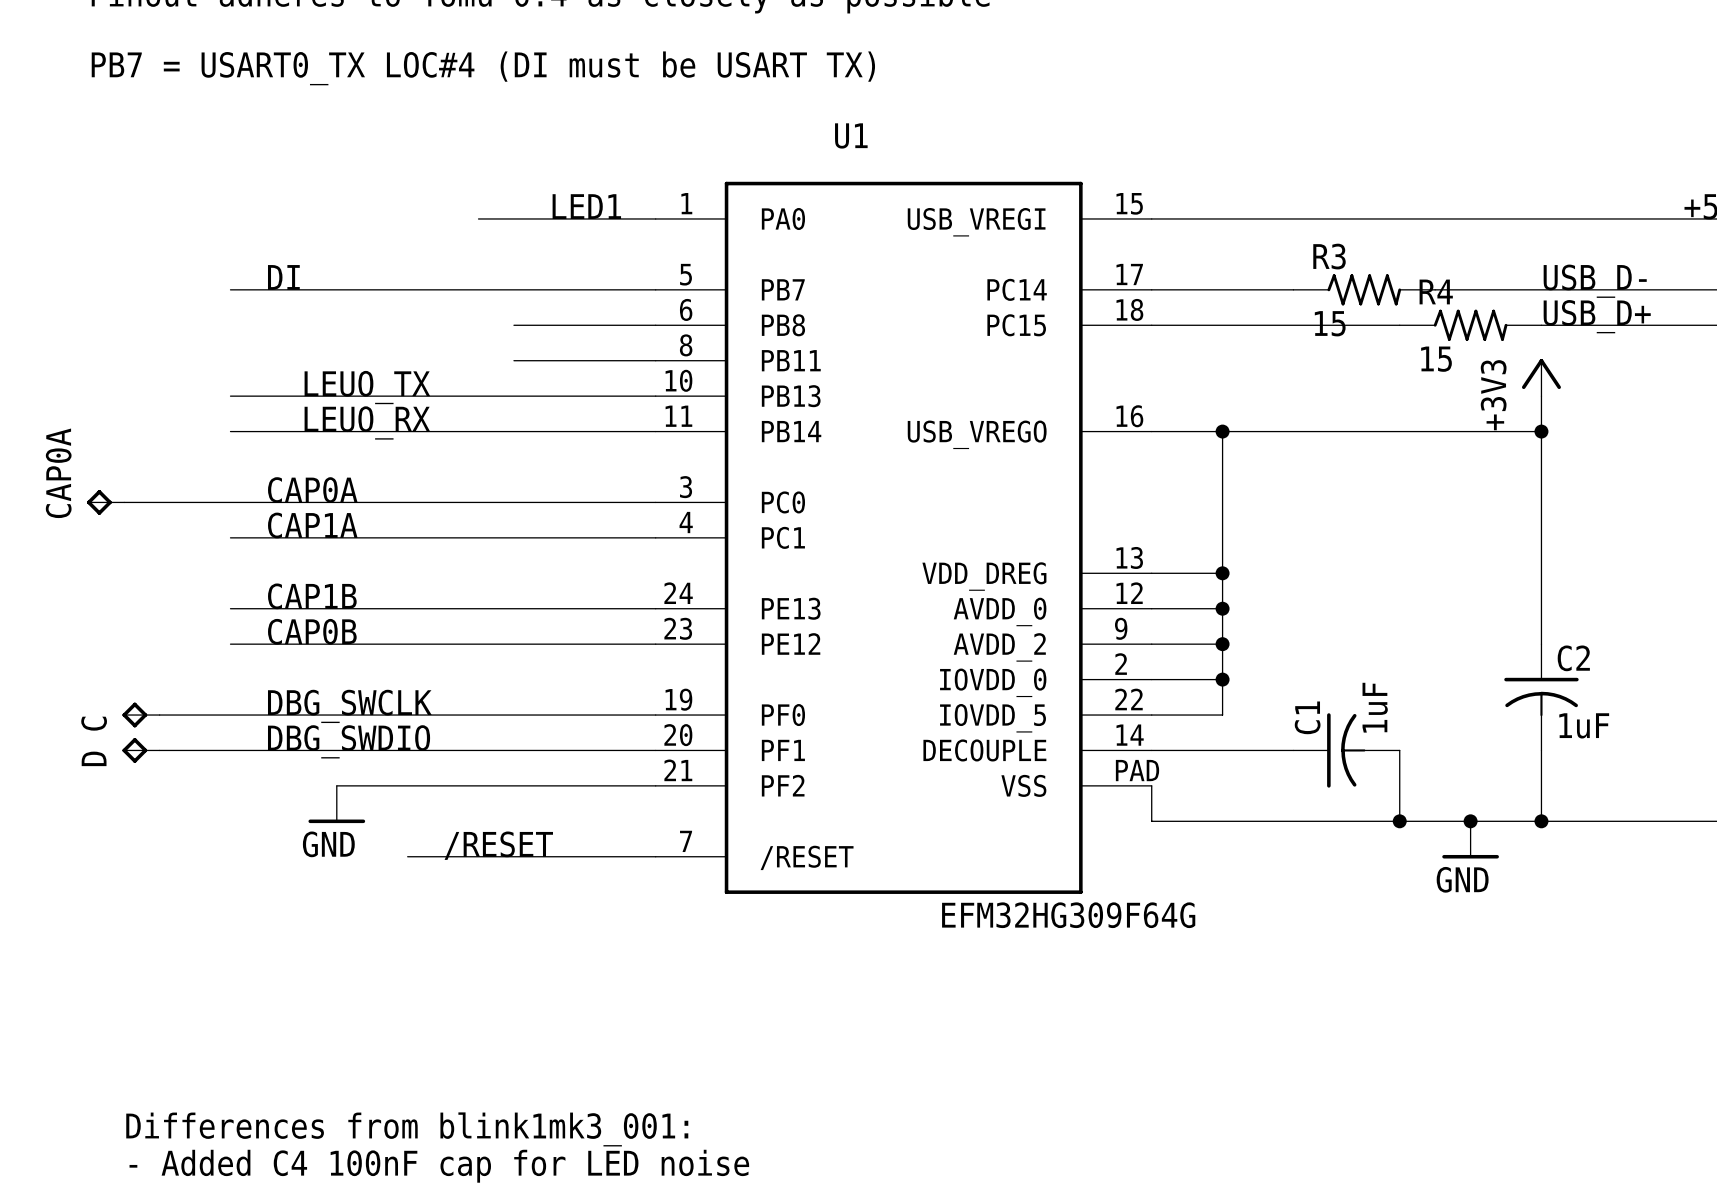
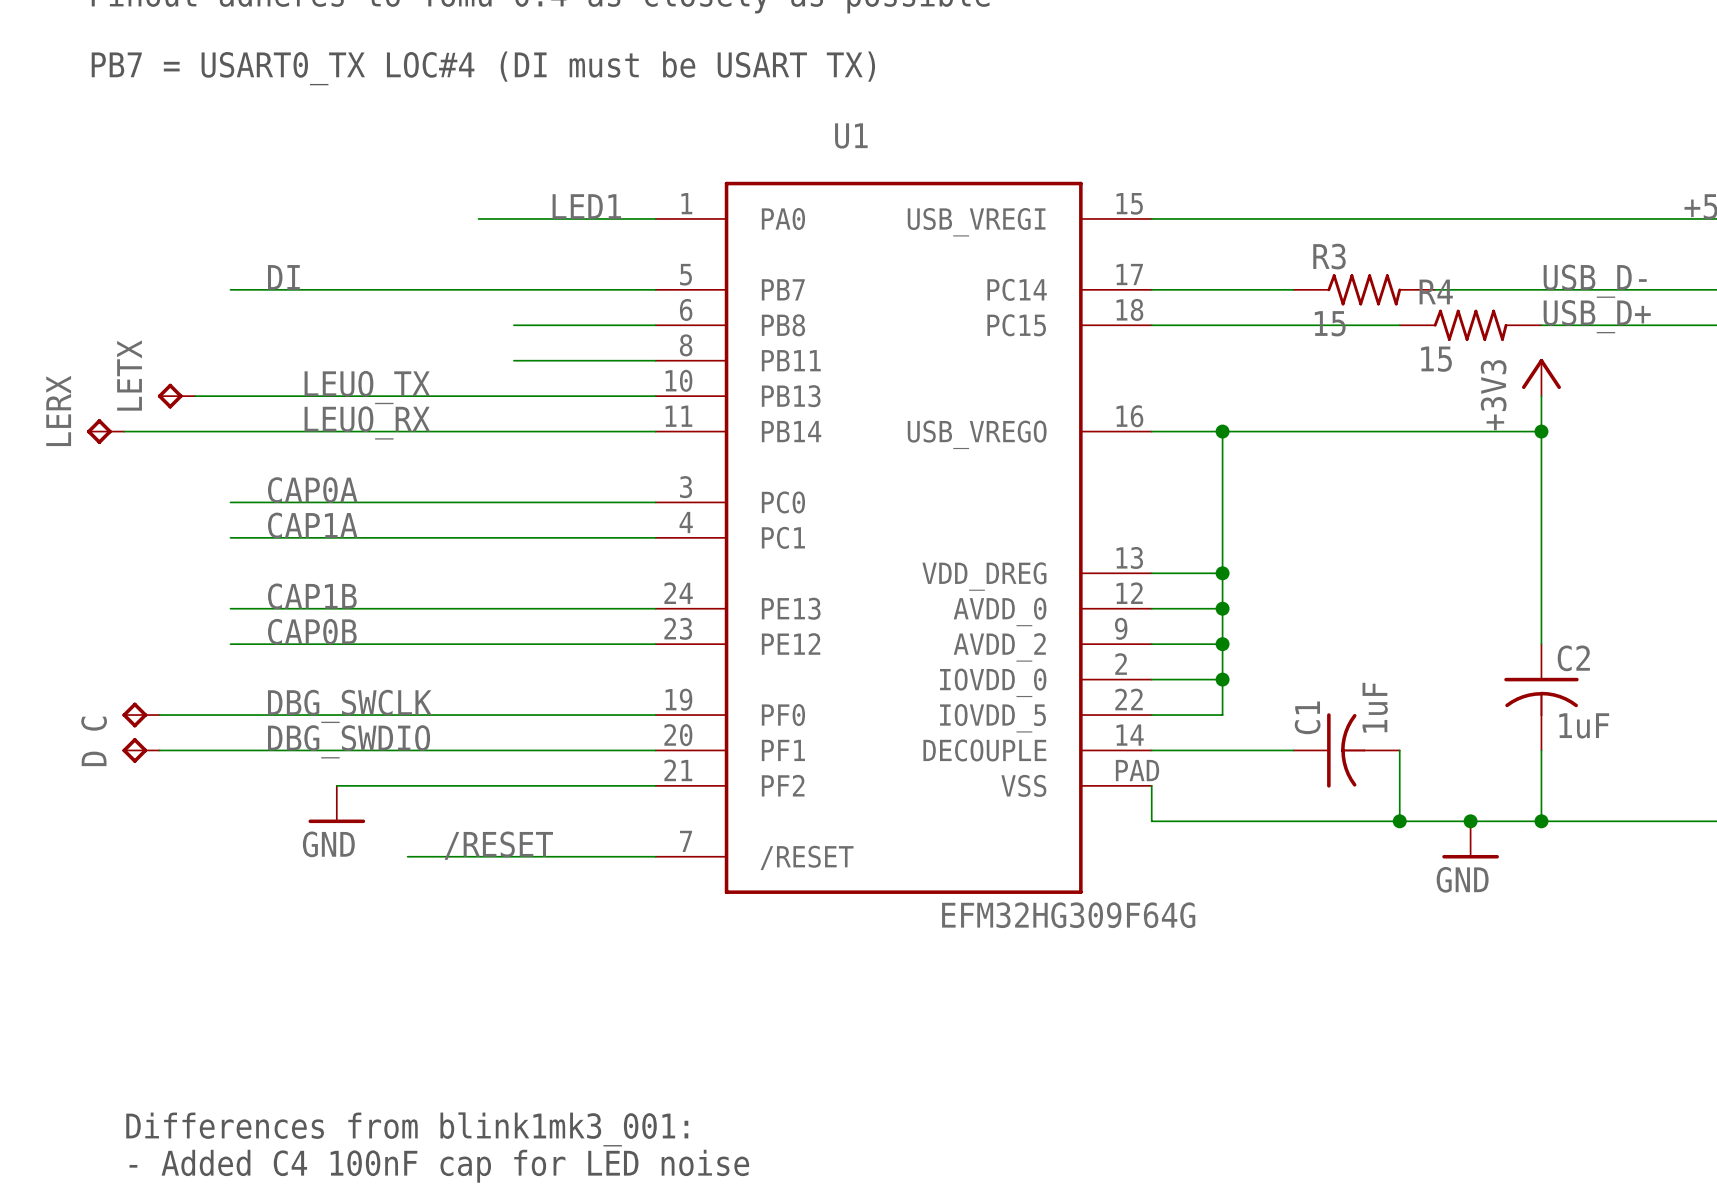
LETX: none -> (176, 396)
wire: none -> (195, 396) (230, 396)
LERX: none -> (105, 431)
CAP0A: (105, 502) -> none
wire: (124, 502) (230, 502) -> (124, 431) (230, 431)

